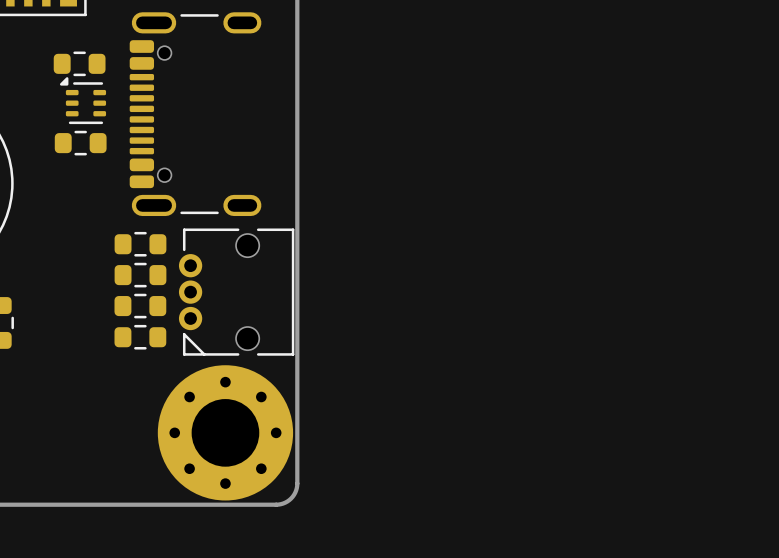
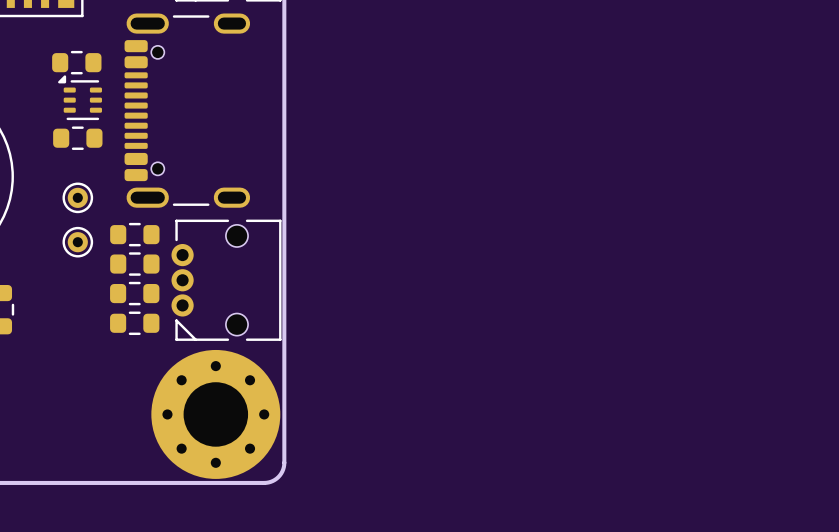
part: none -> (77, 197)
part: none -> (77, 242)

